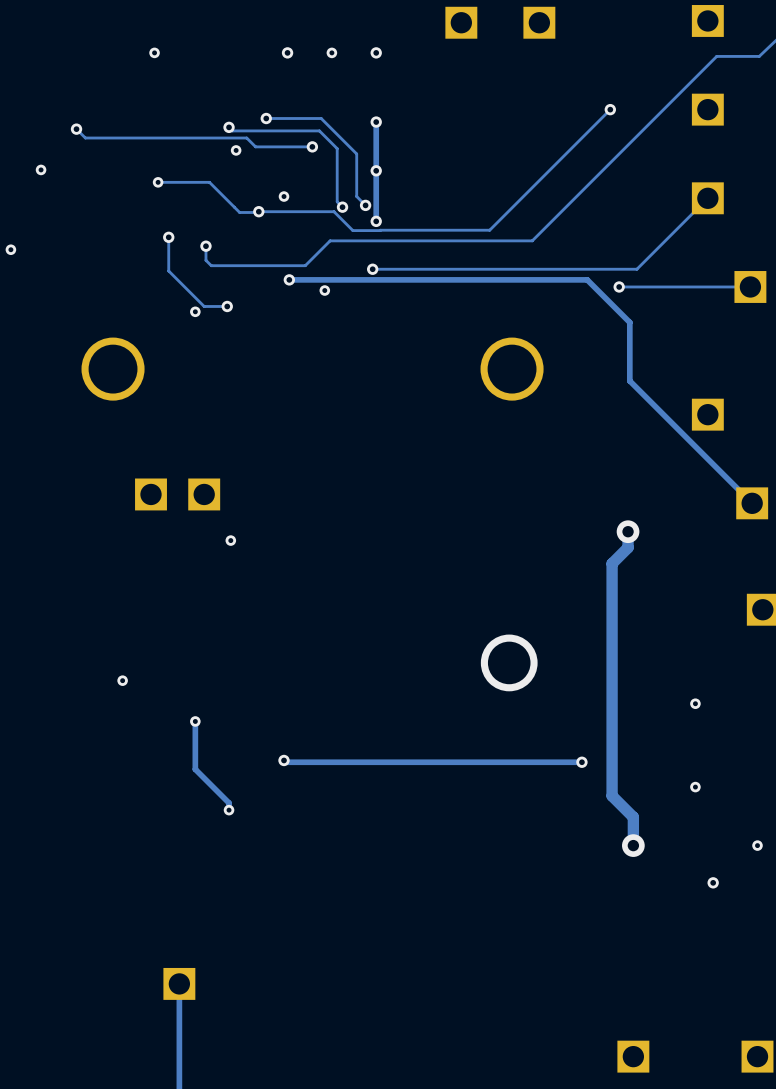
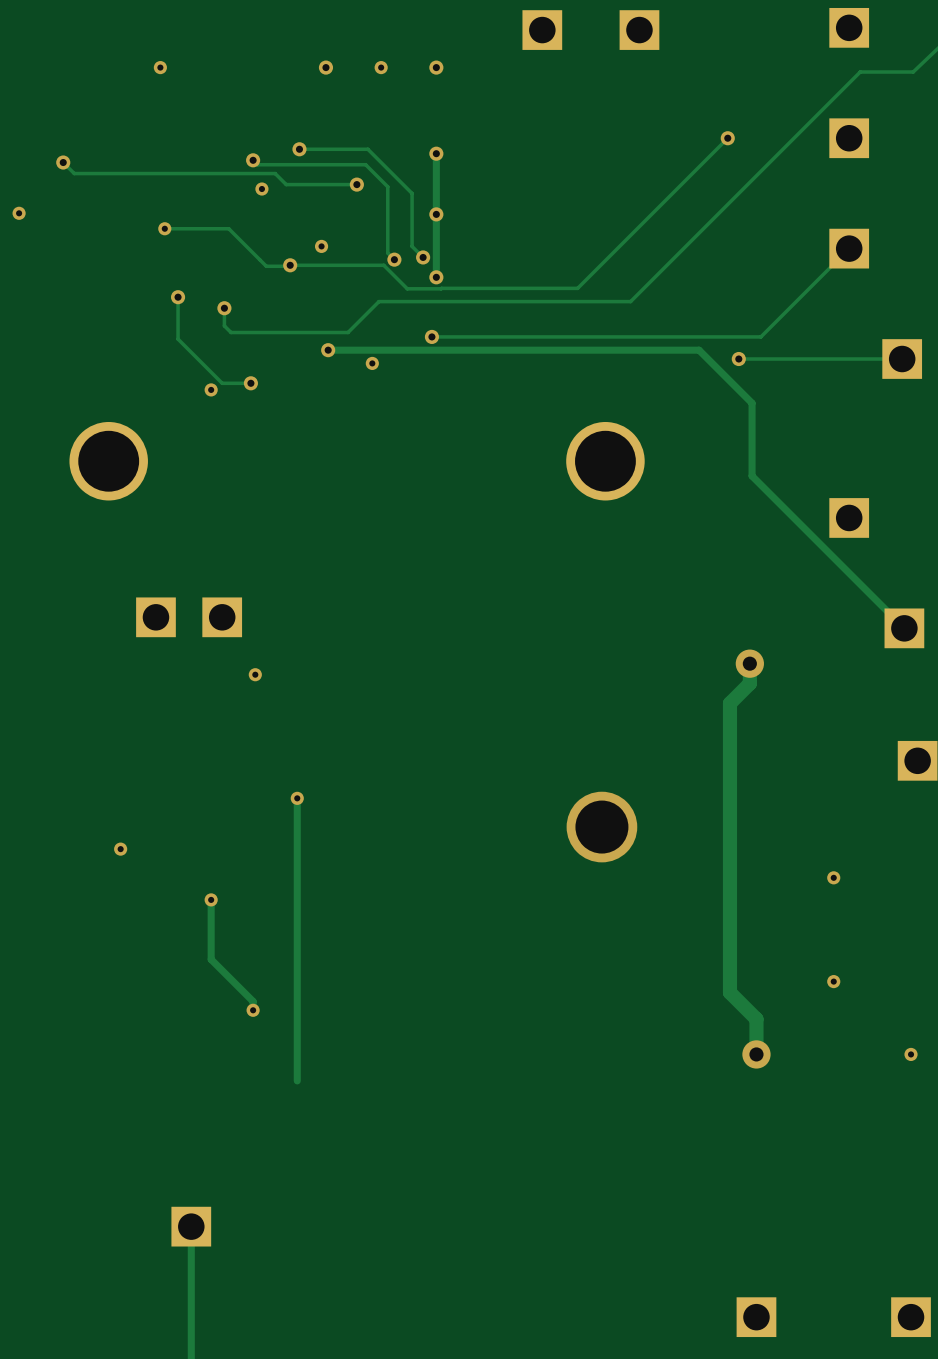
track: none -> (297, 798) (297, 1080)
via: none -> (297, 798)
track: (284, 760) (285, 762) (581, 762) -> none
via: (284, 760) -> none
via: (581, 762) -> none
via: (713, 882) -> none

